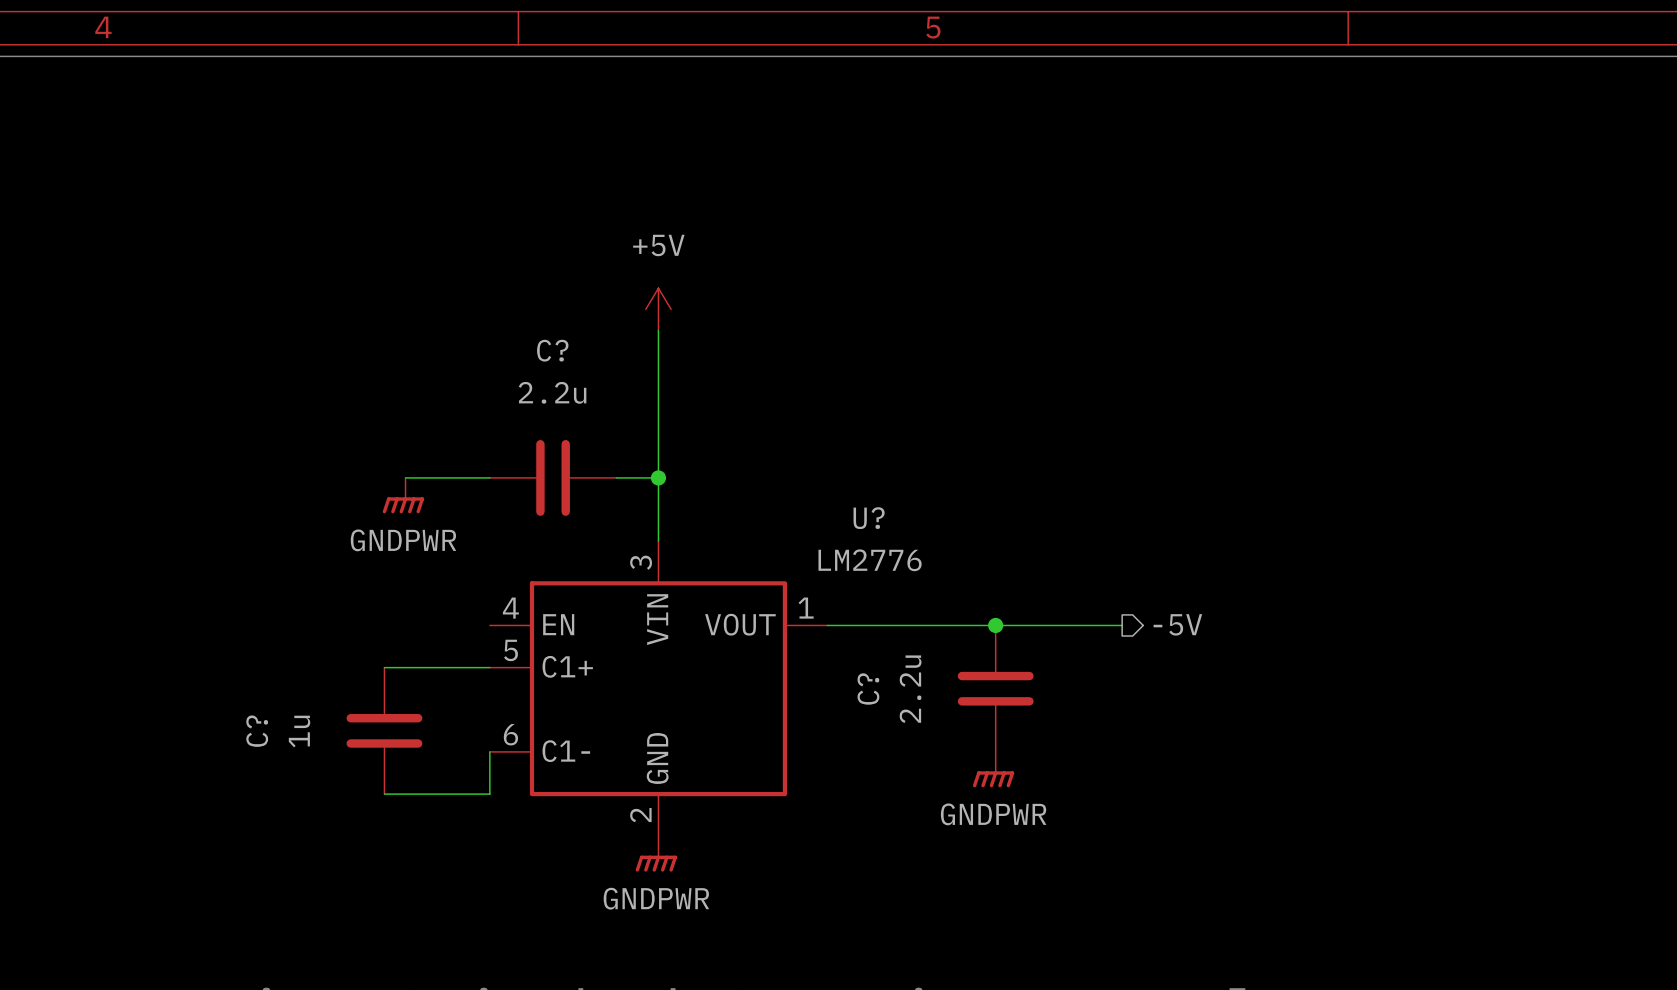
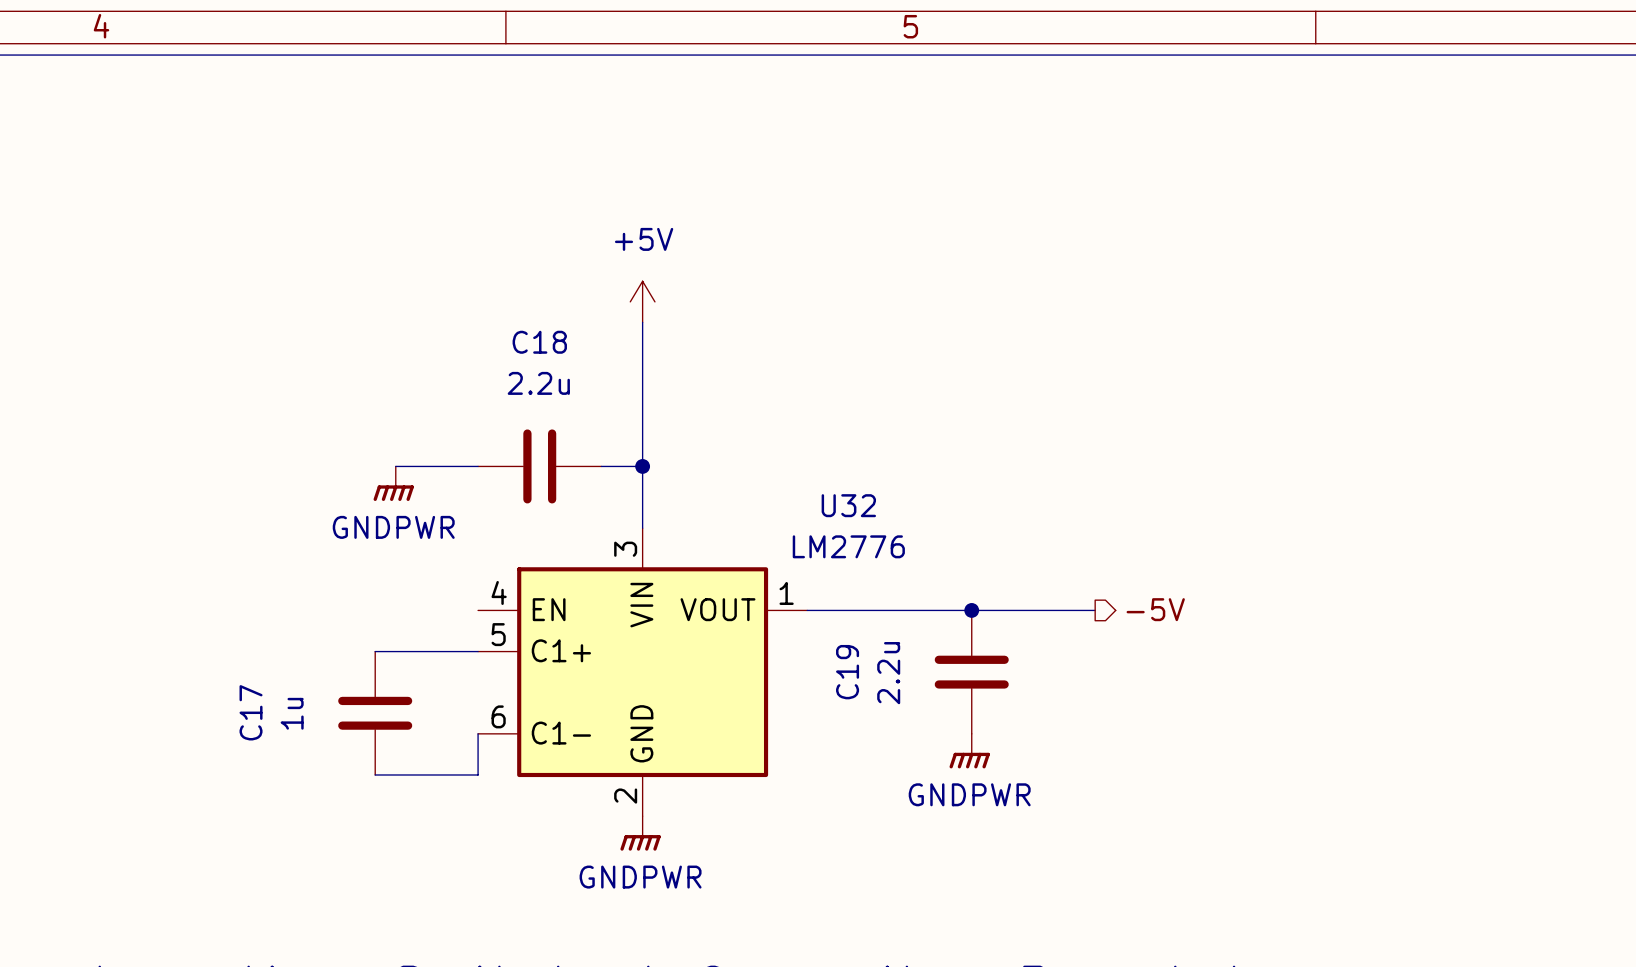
C? name: C? (552, 350) -> C18 (539, 342)
U? name: U? (869, 518) -> U32 (848, 505)
C? name: C? (868, 689) -> C19 (847, 672)
C? name: C? (257, 731) -> C17 (251, 712)

